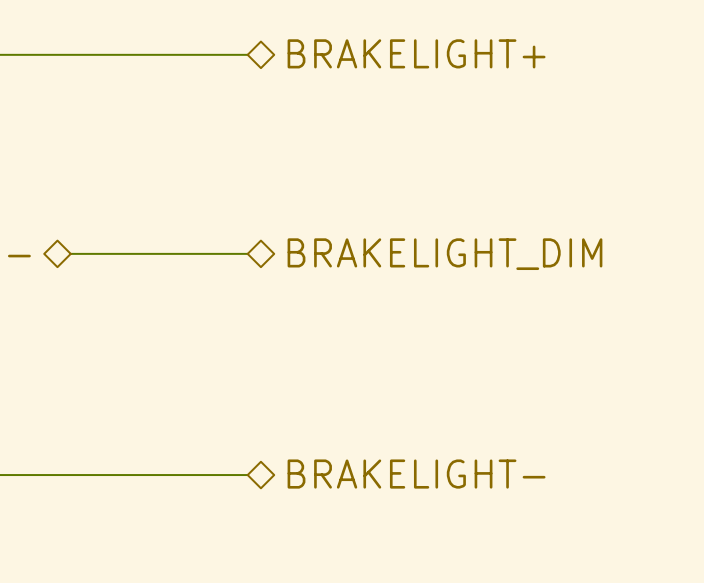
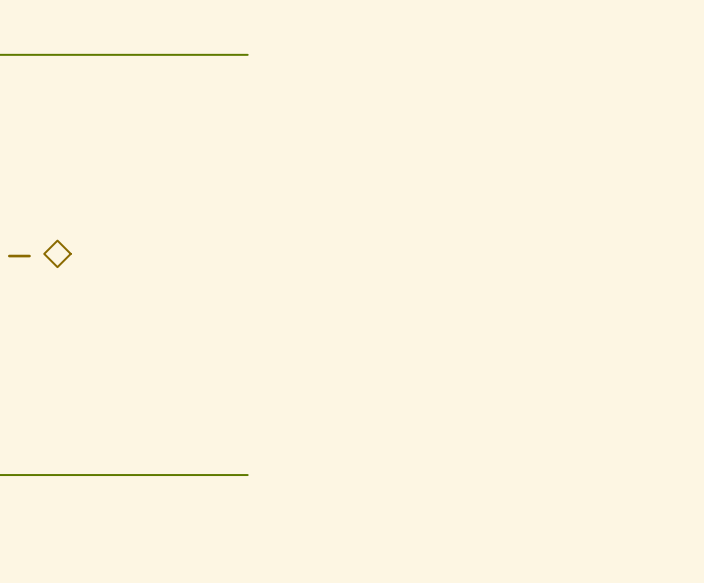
hierarchical label: BRAKELIGHT+ (416, 53) -> none
wire: (70, 253) (247, 253) -> none
hierarchical label: BRAKELIGHT_DIM (444, 254) -> none
hierarchical label: BRAKELIGHT- (416, 474) -> none

